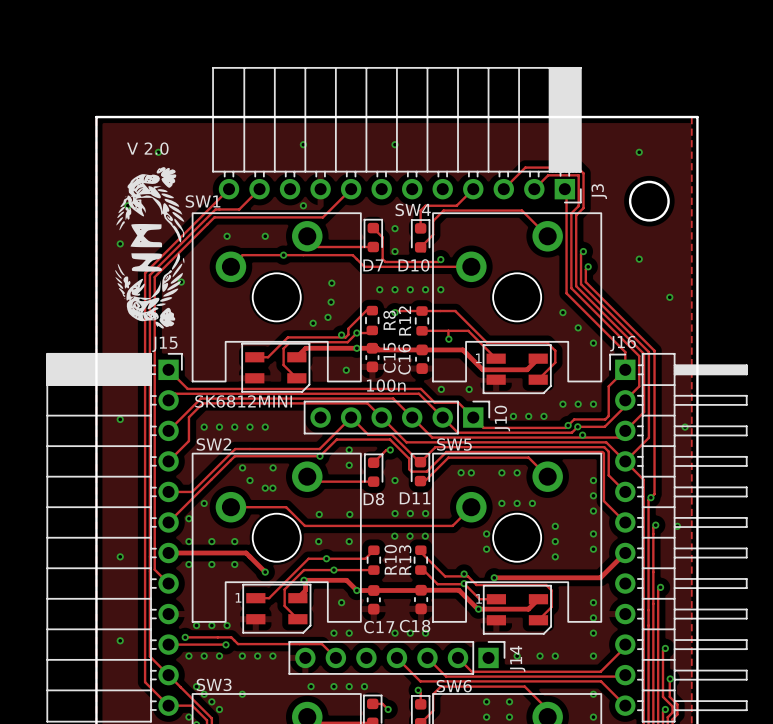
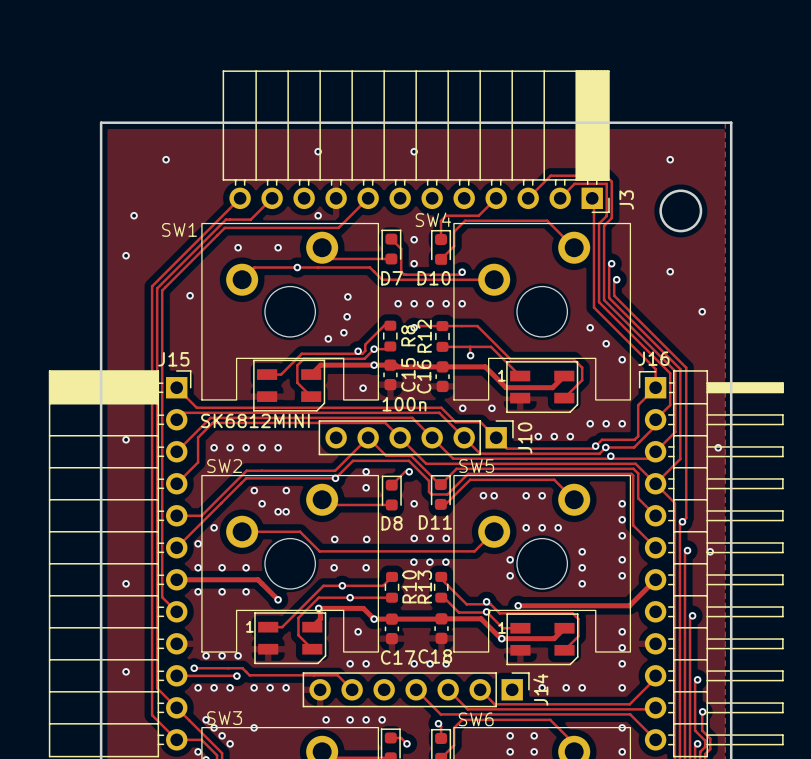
text: V 2.0 (147, 148) -> none
drawing: [115, 167, 185, 329] -> none
SW1 name position: SW1 (203, 201) -> SW1 (179, 229)

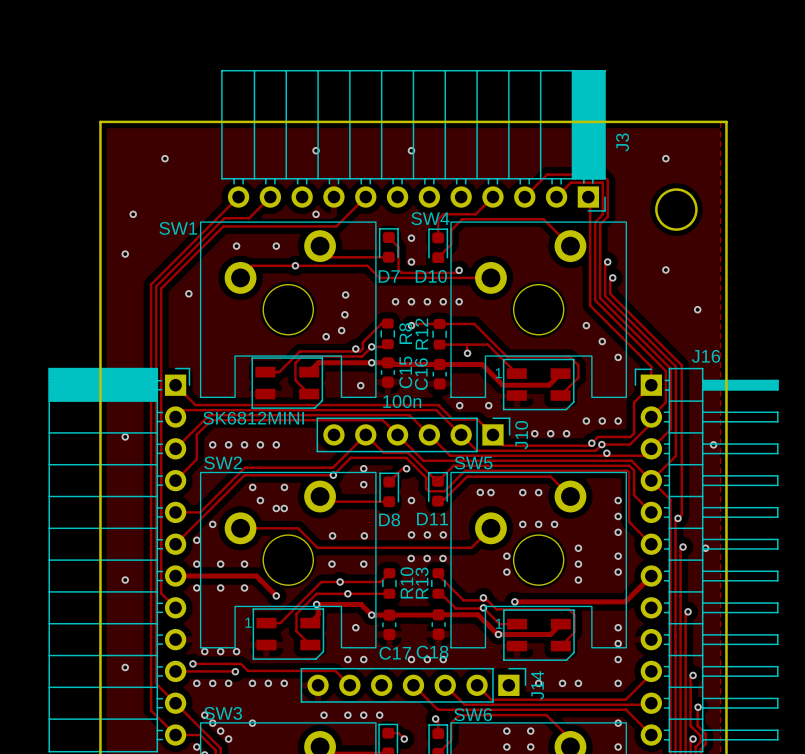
J3 name position: J3 (626, 200) -> J3 (622, 142)
J16 name position: J16 (653, 358) -> J16 (705, 356)
J15 name: J15 (173, 359) -> none

